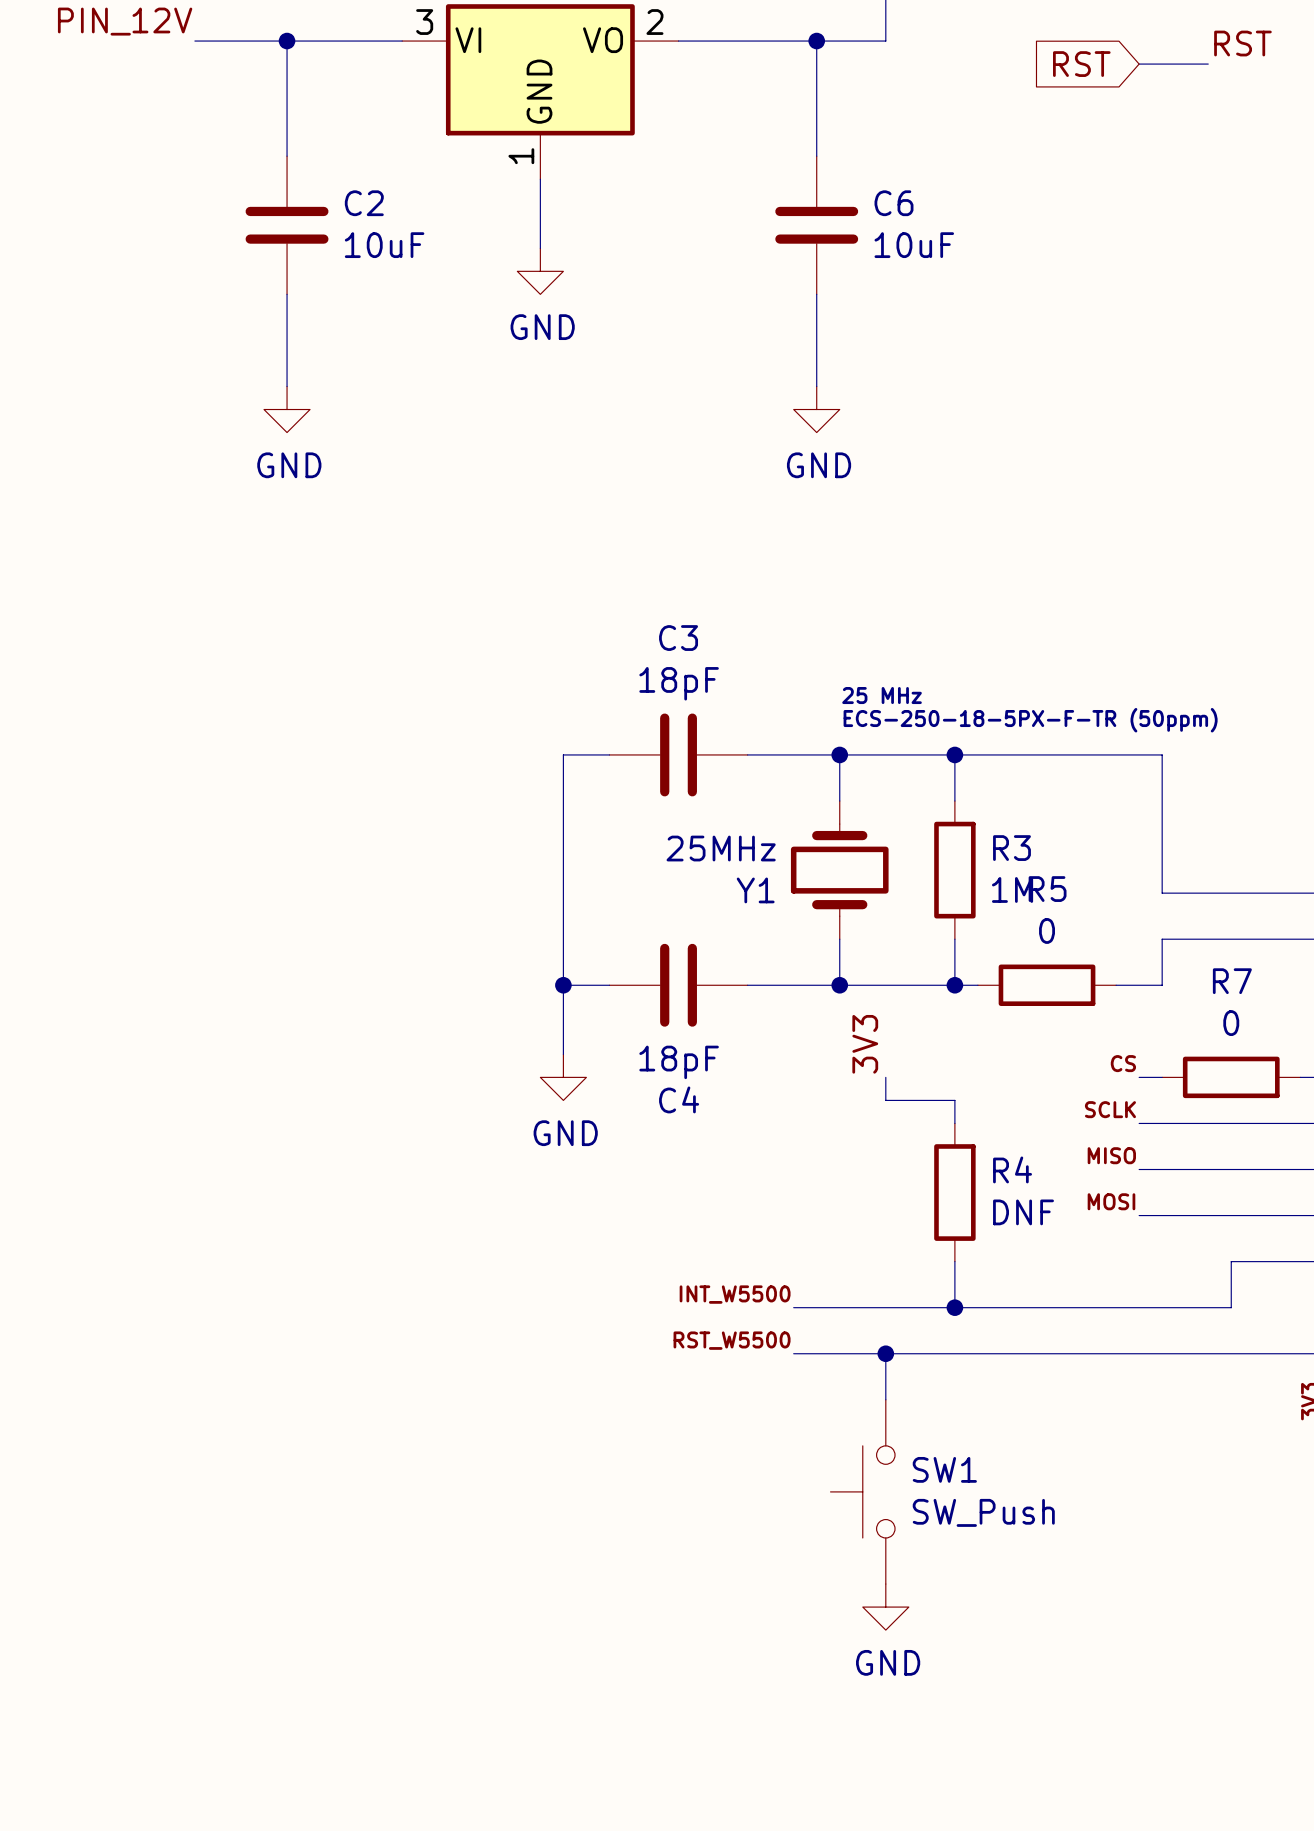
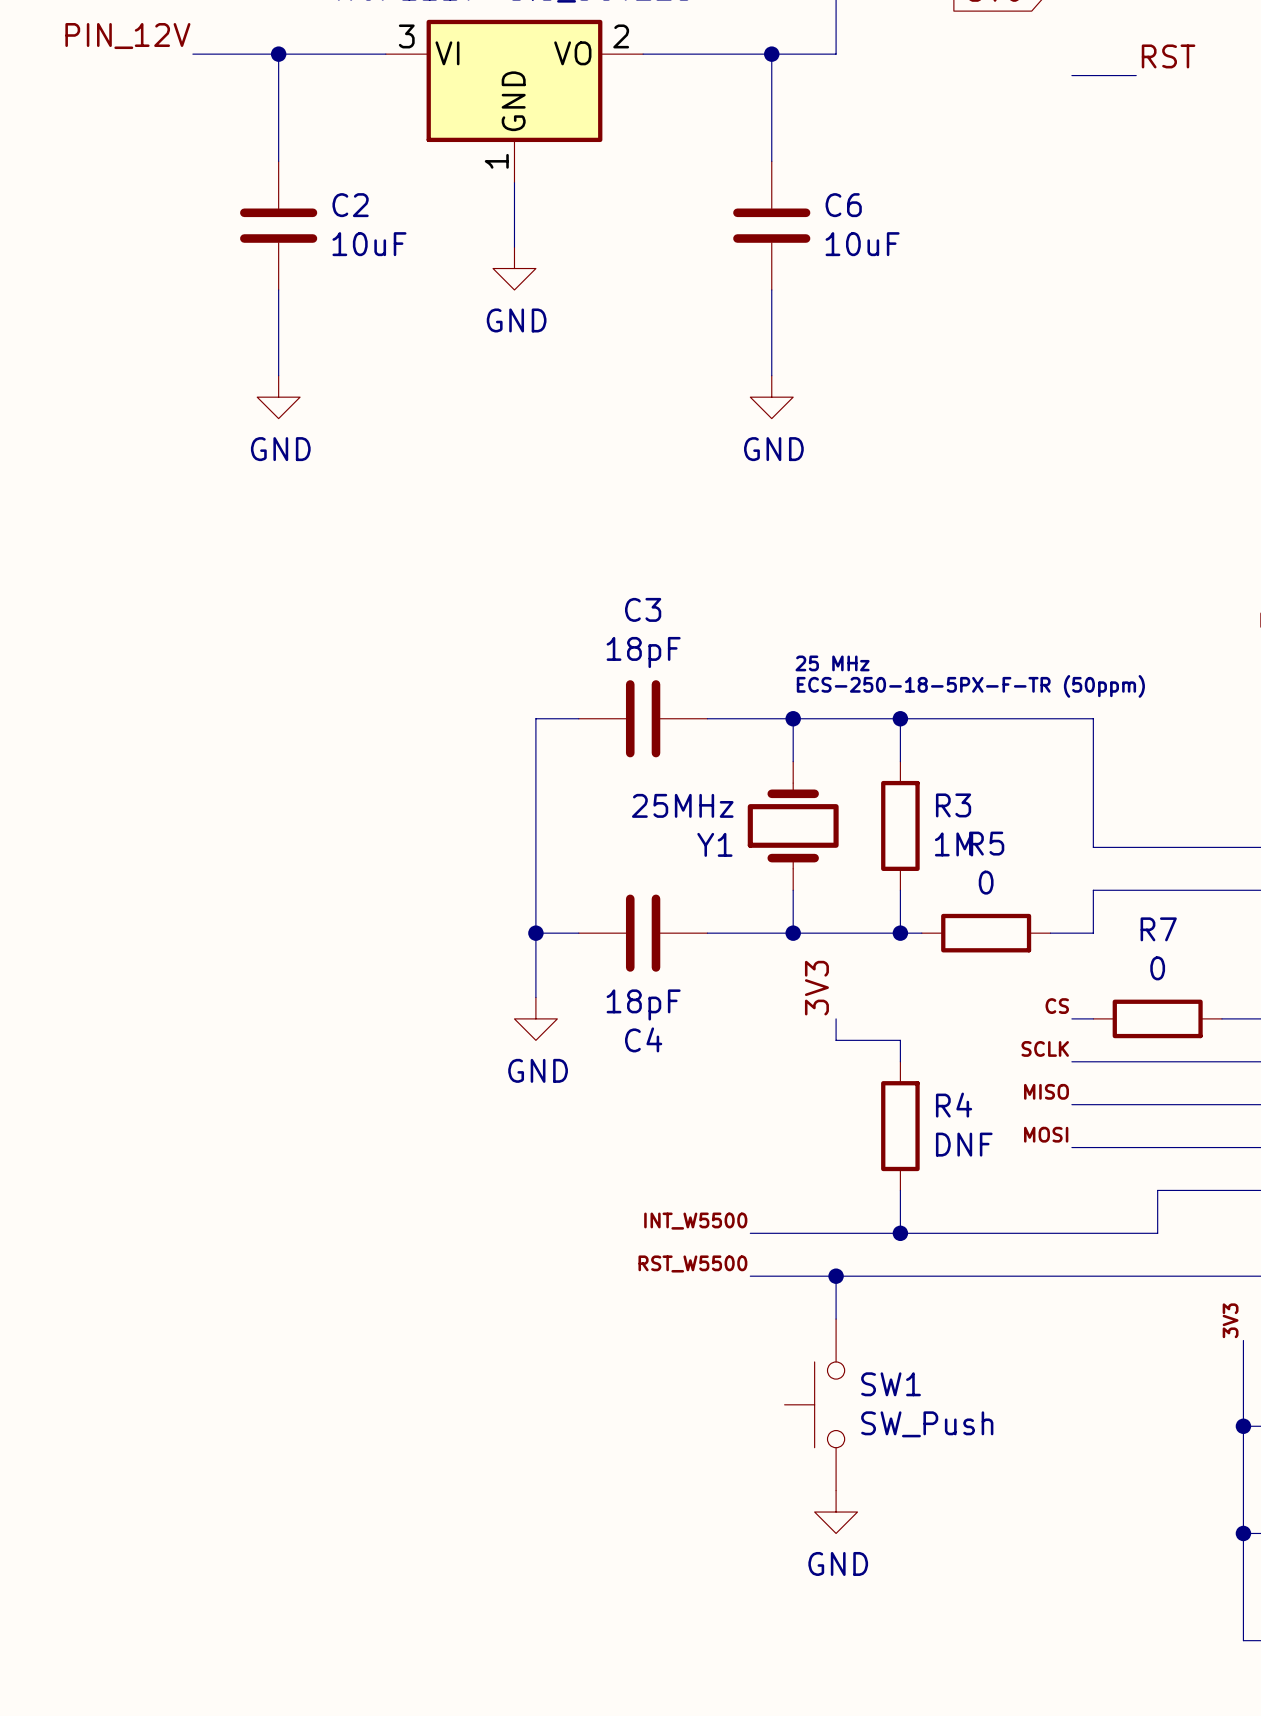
global label: RST (1081, 64) -> none

